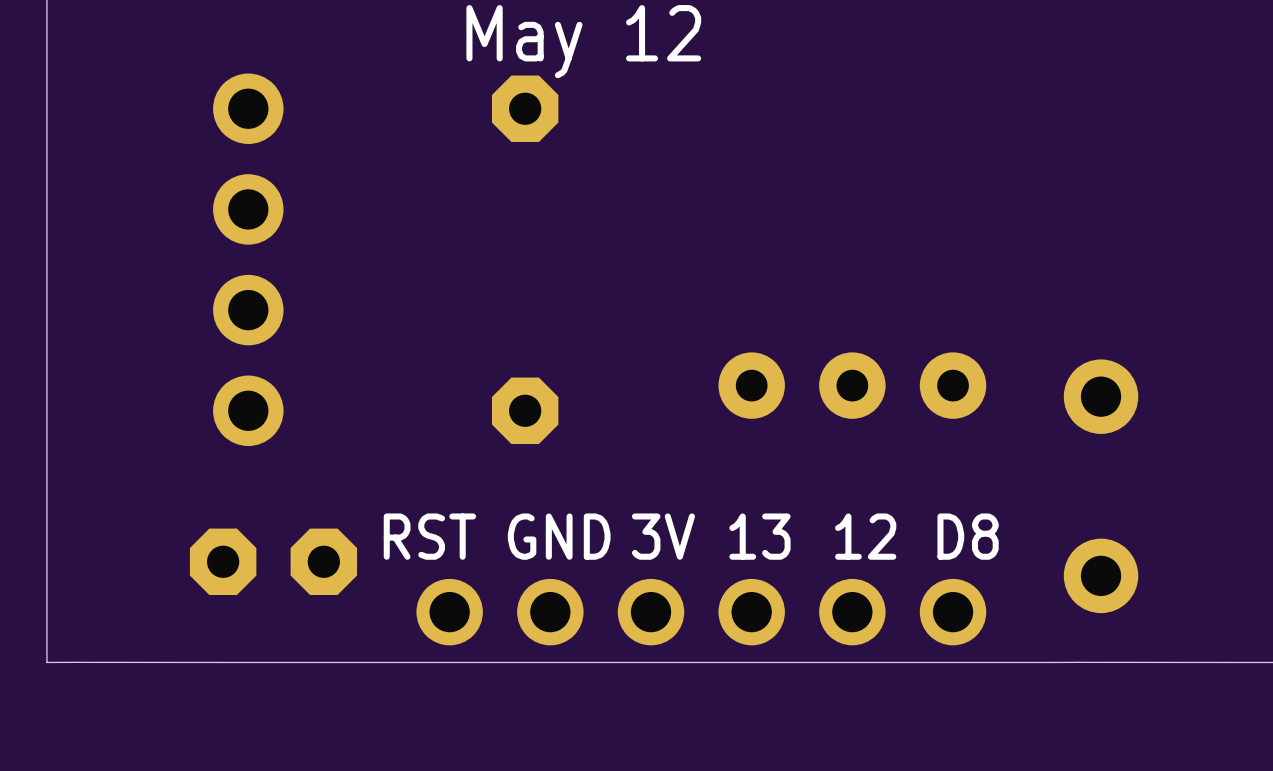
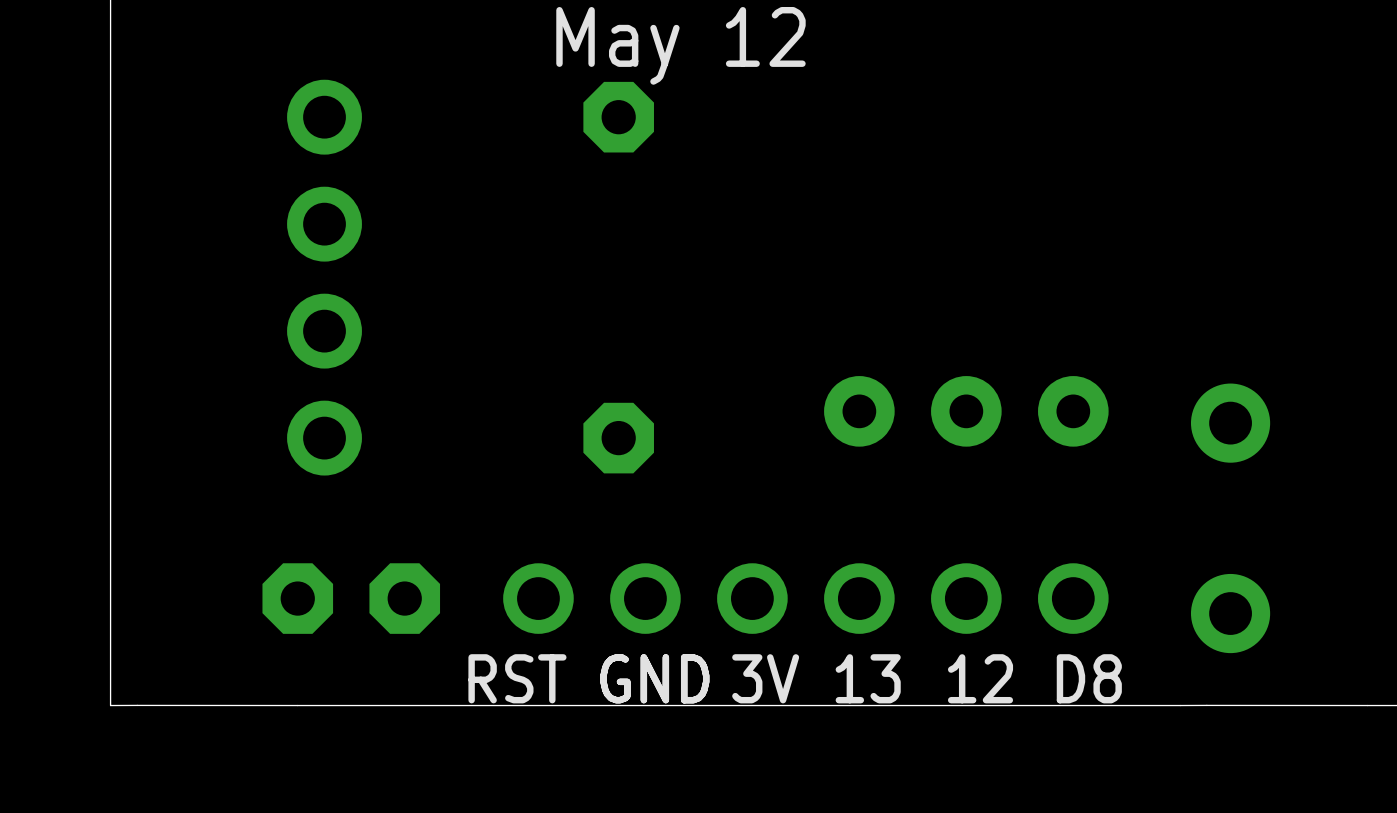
text position: RST (429, 536) -> RST (517, 678)
text position: GND (559, 536) -> GND (654, 678)
text position: 3V (663, 536) -> 3V (765, 678)
text position: 13 (759, 536) -> 13 (868, 678)
text position: 12 (865, 536) -> 12 (980, 678)
text position: D8 (968, 536) -> D8 (1089, 678)
part position: (701, 612) -> (805, 598)

